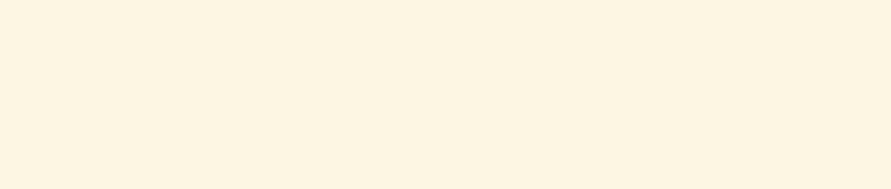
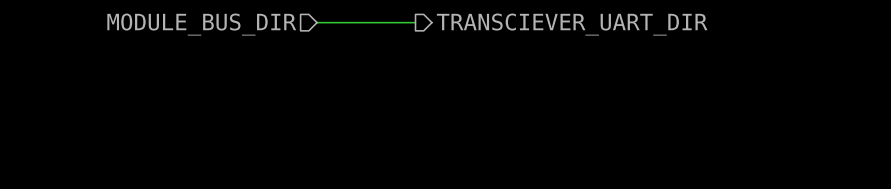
hierarchical label: none -> MODULE_BUS_DIR (201, 24)
wire: none -> (317, 22) (415, 22)
sheet pin: none -> TRANSCIEVER_UART_DIR (572, 24)

